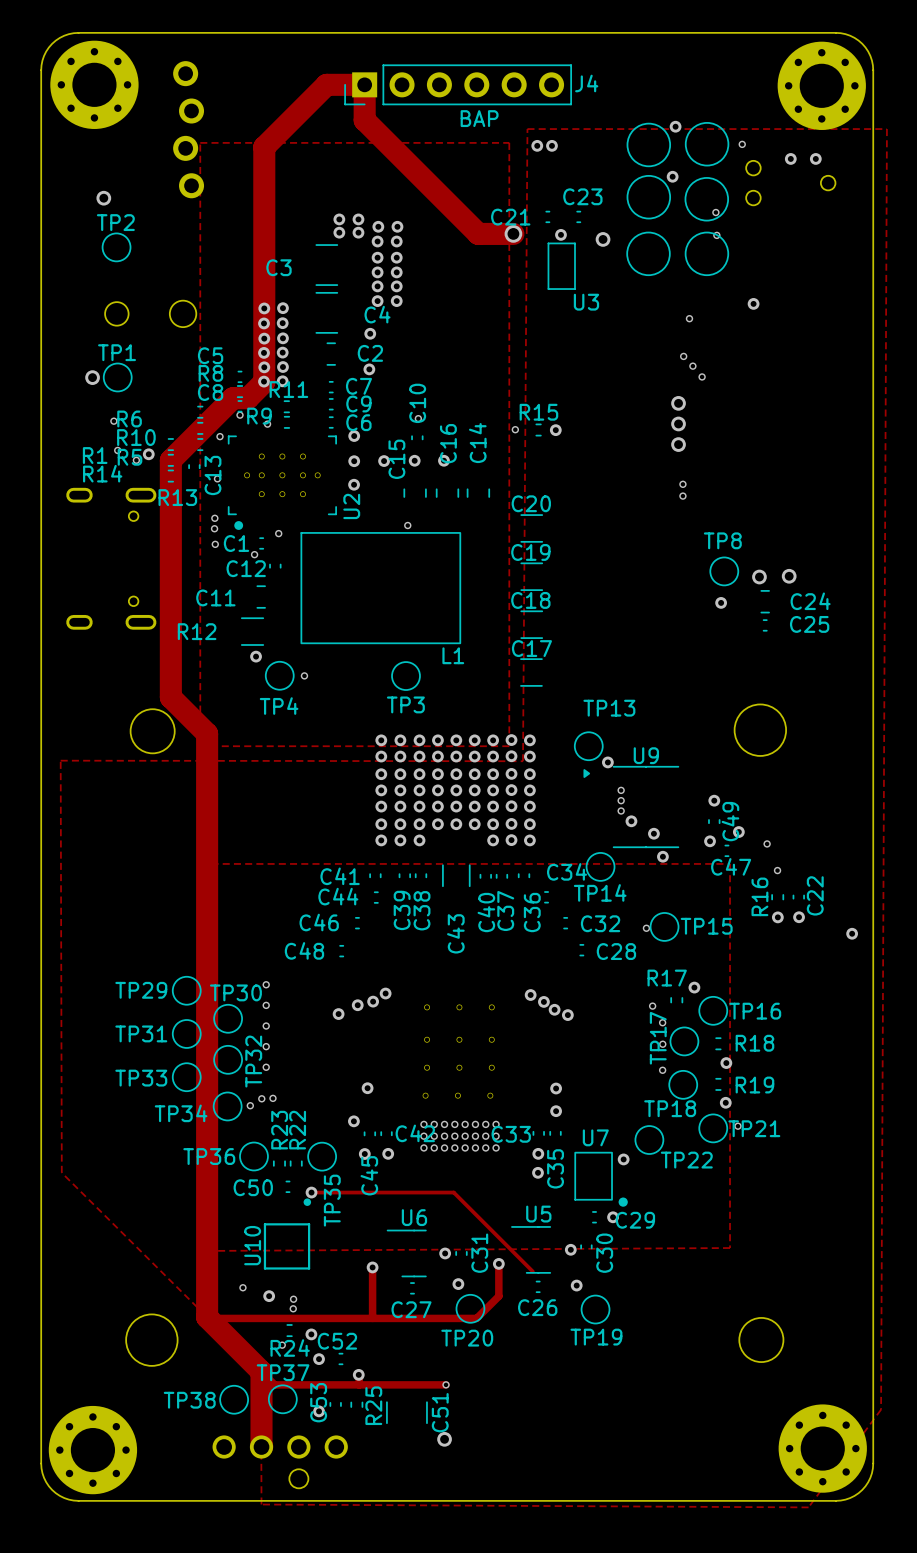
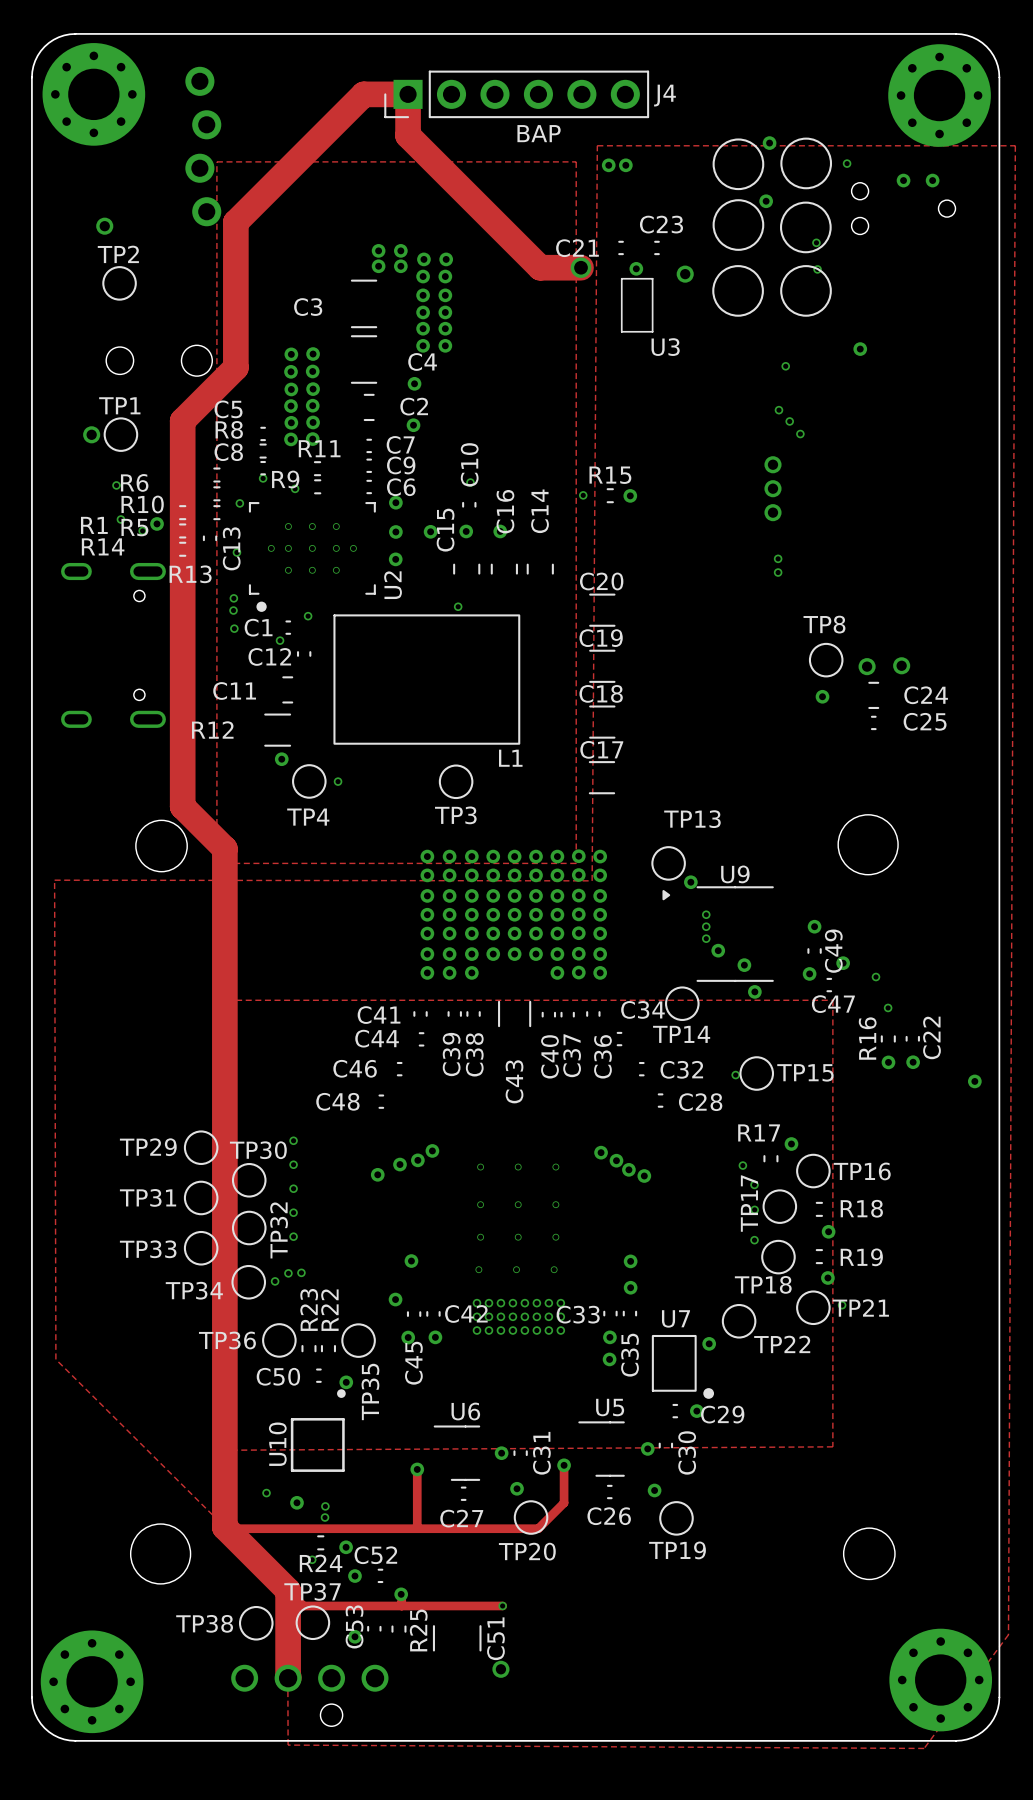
track: (264, 147) (264, 382) (248, 398) (233, 398) (170, 460) -> (291, 166) (235, 222) (235, 367) (182, 420) (182, 531)
track: (311, 1192) (453, 1192) (532, 1271) -> none

